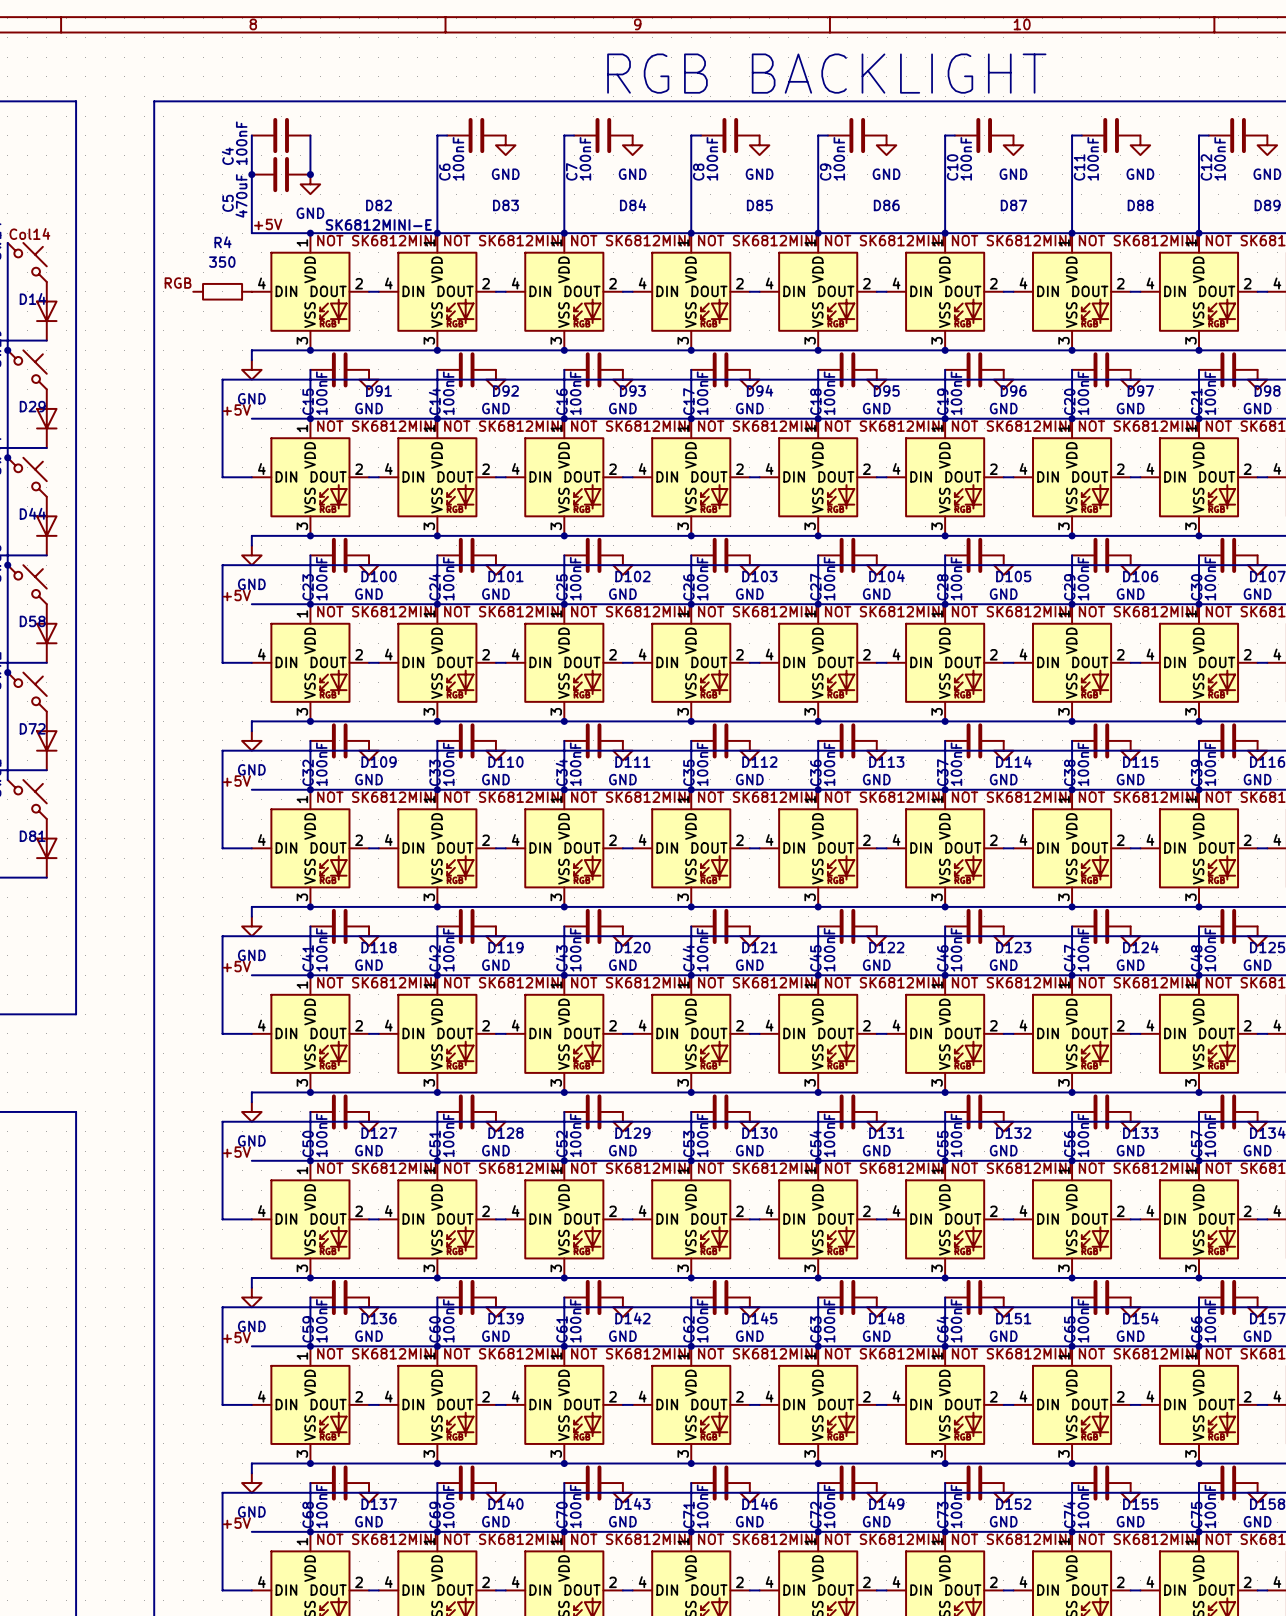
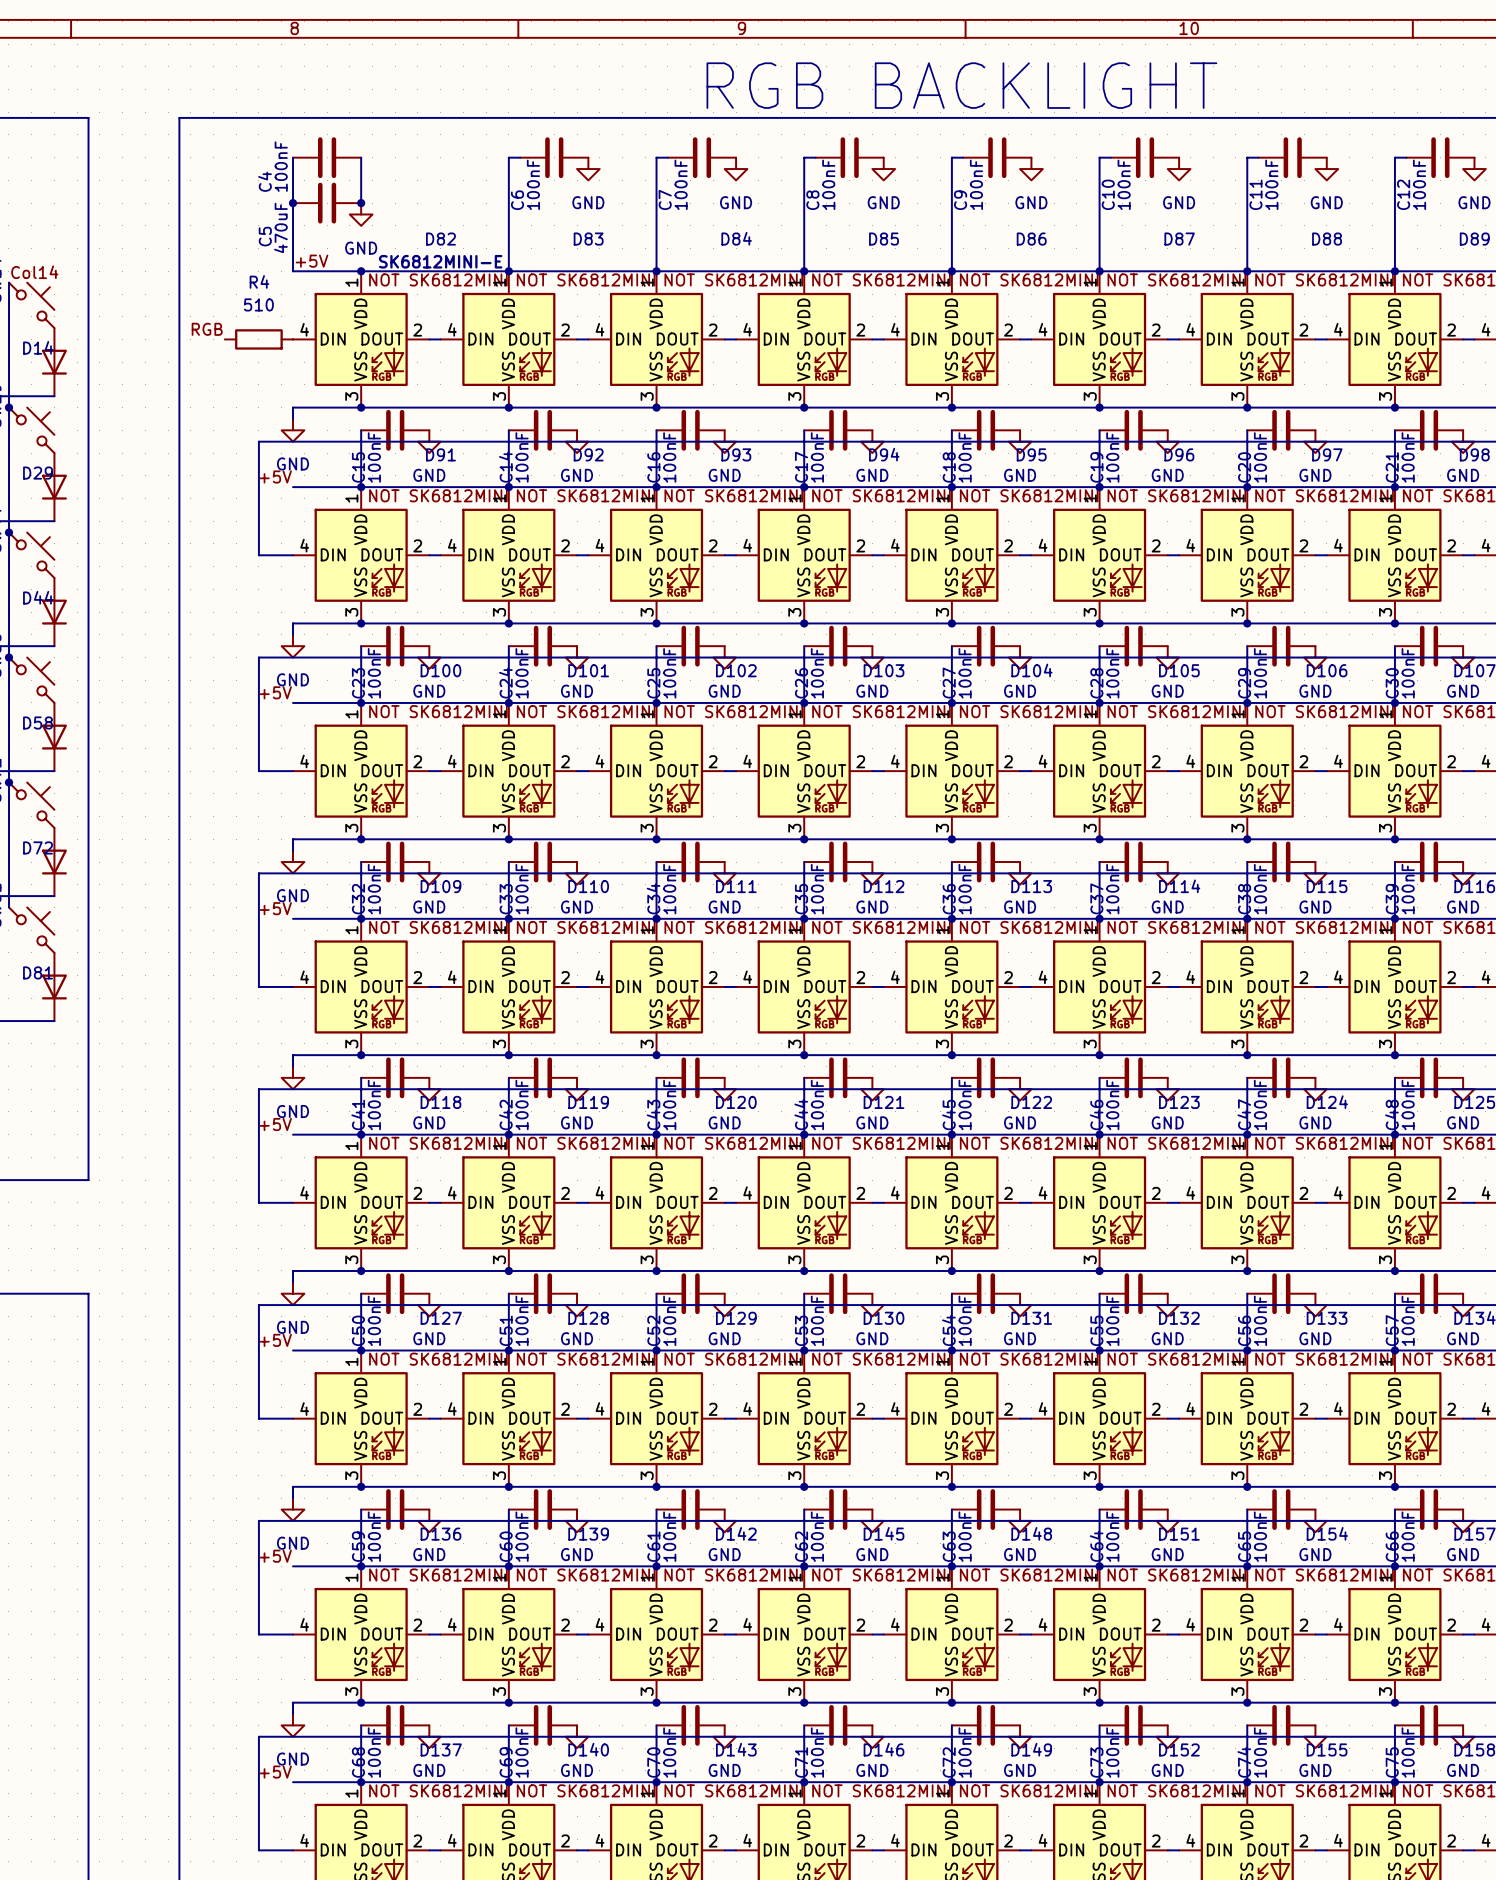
R4 value: 350 (222, 262) -> 510 (258, 304)

